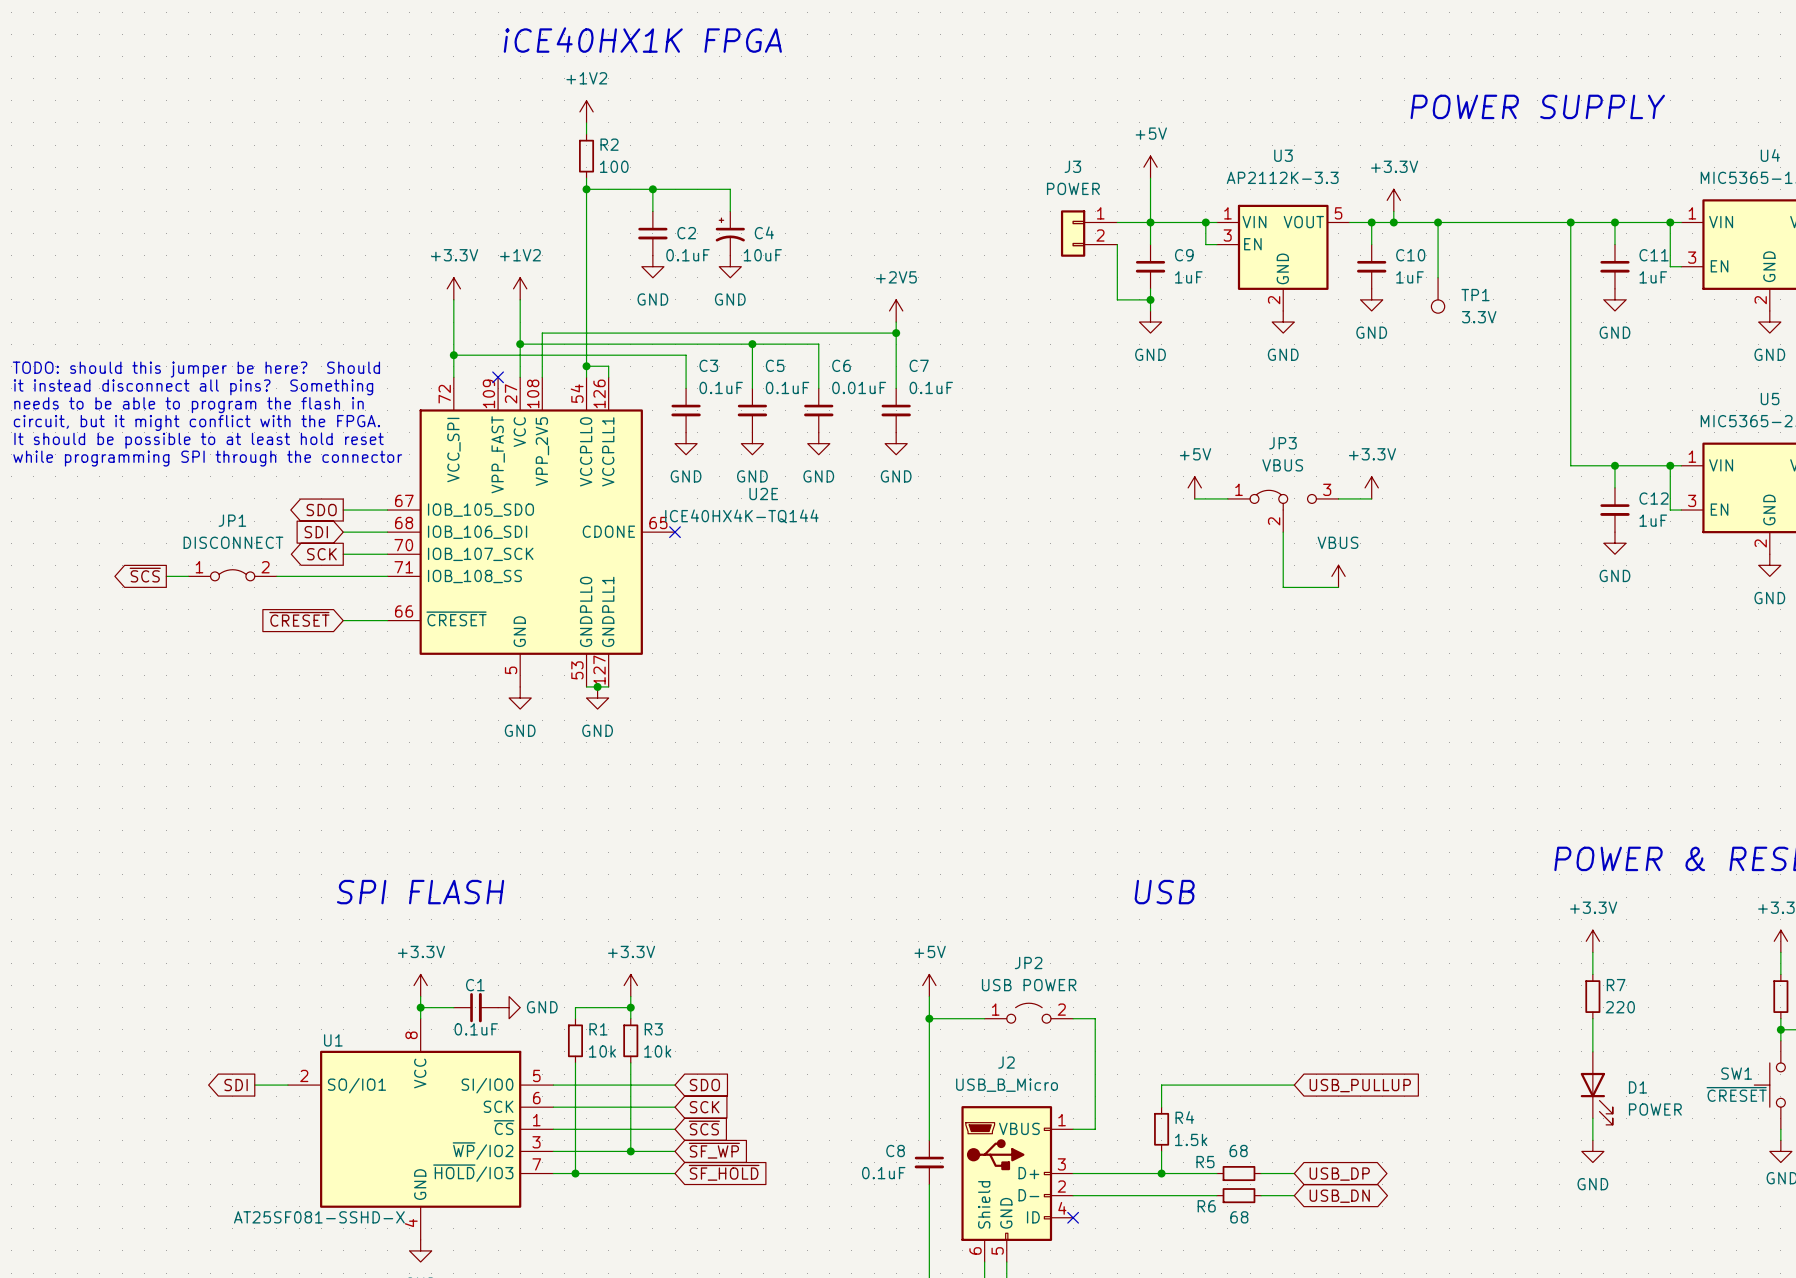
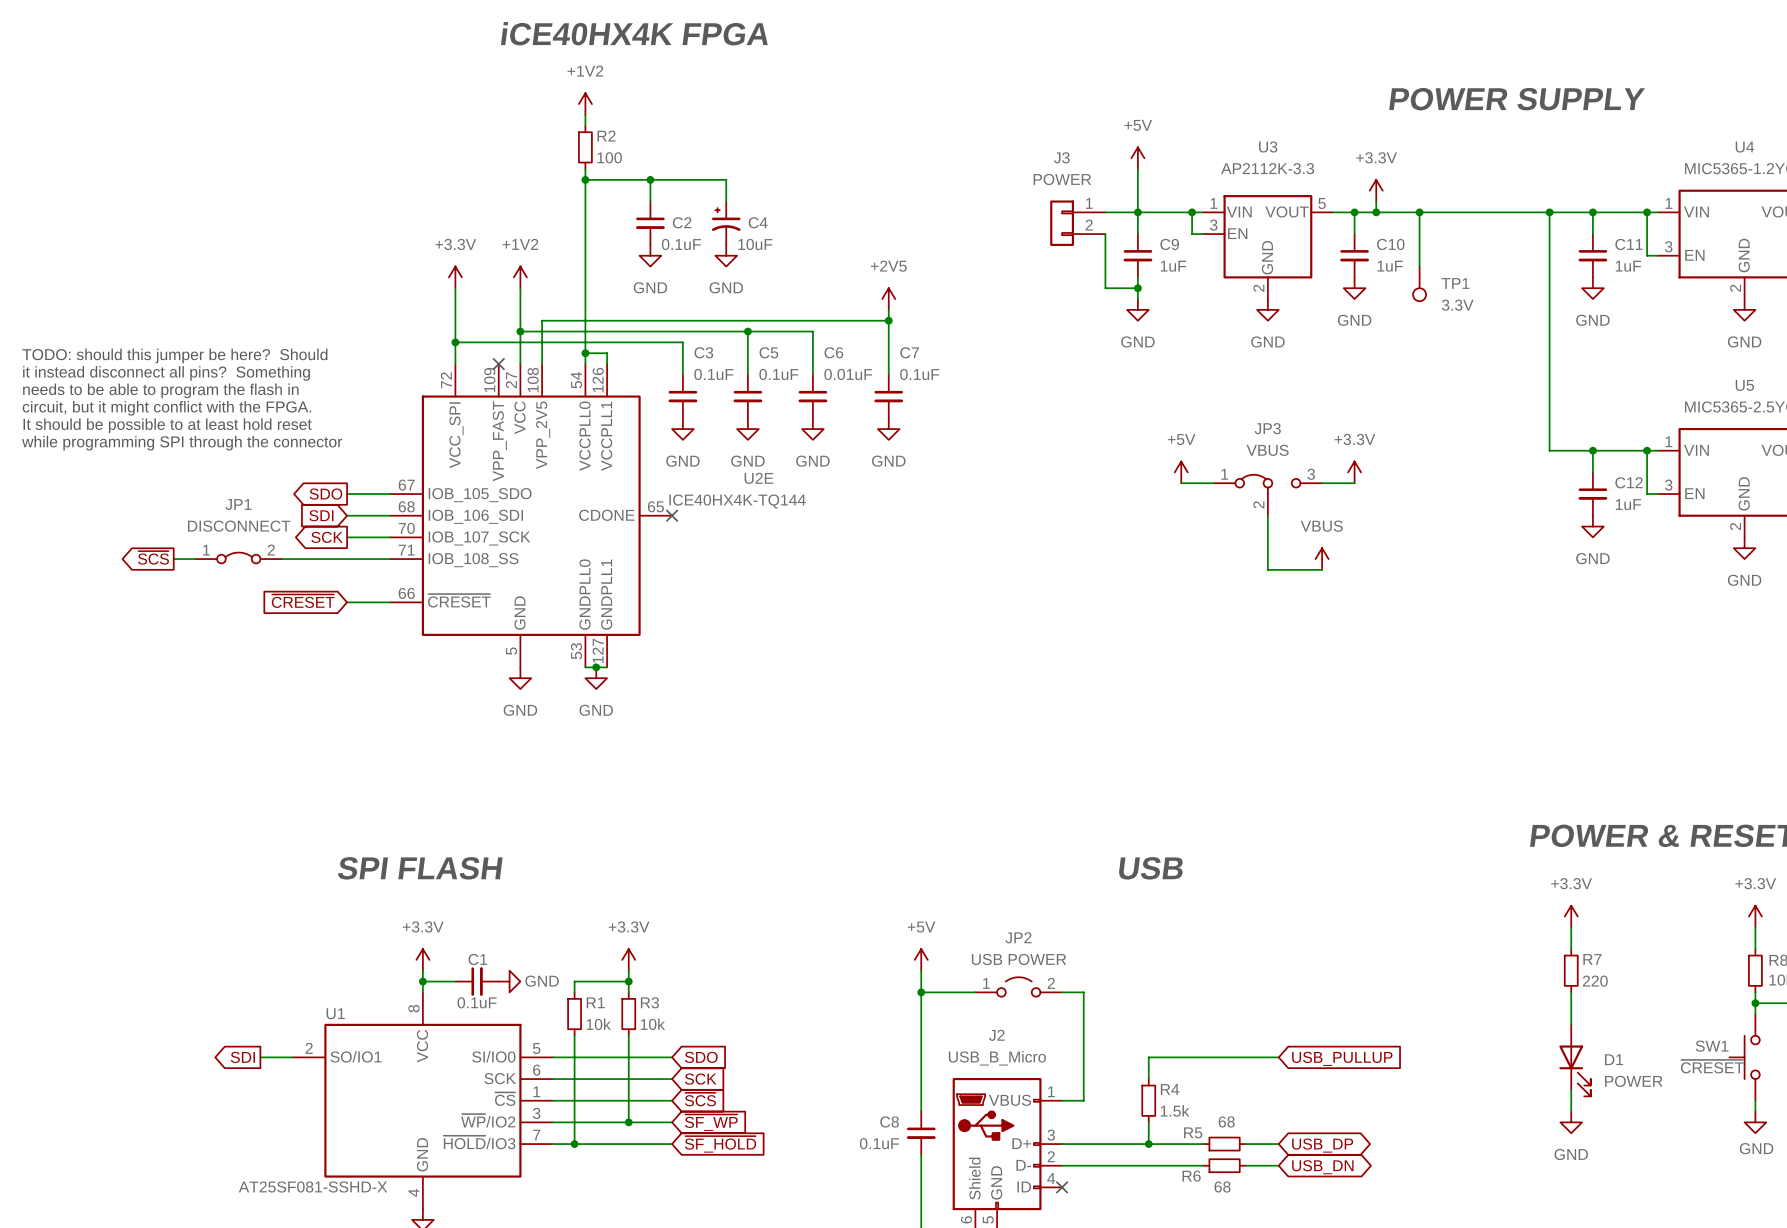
text: iCE40HX1K FPGA (642, 40) -> iCE40HX4K FPGA (634, 33)

